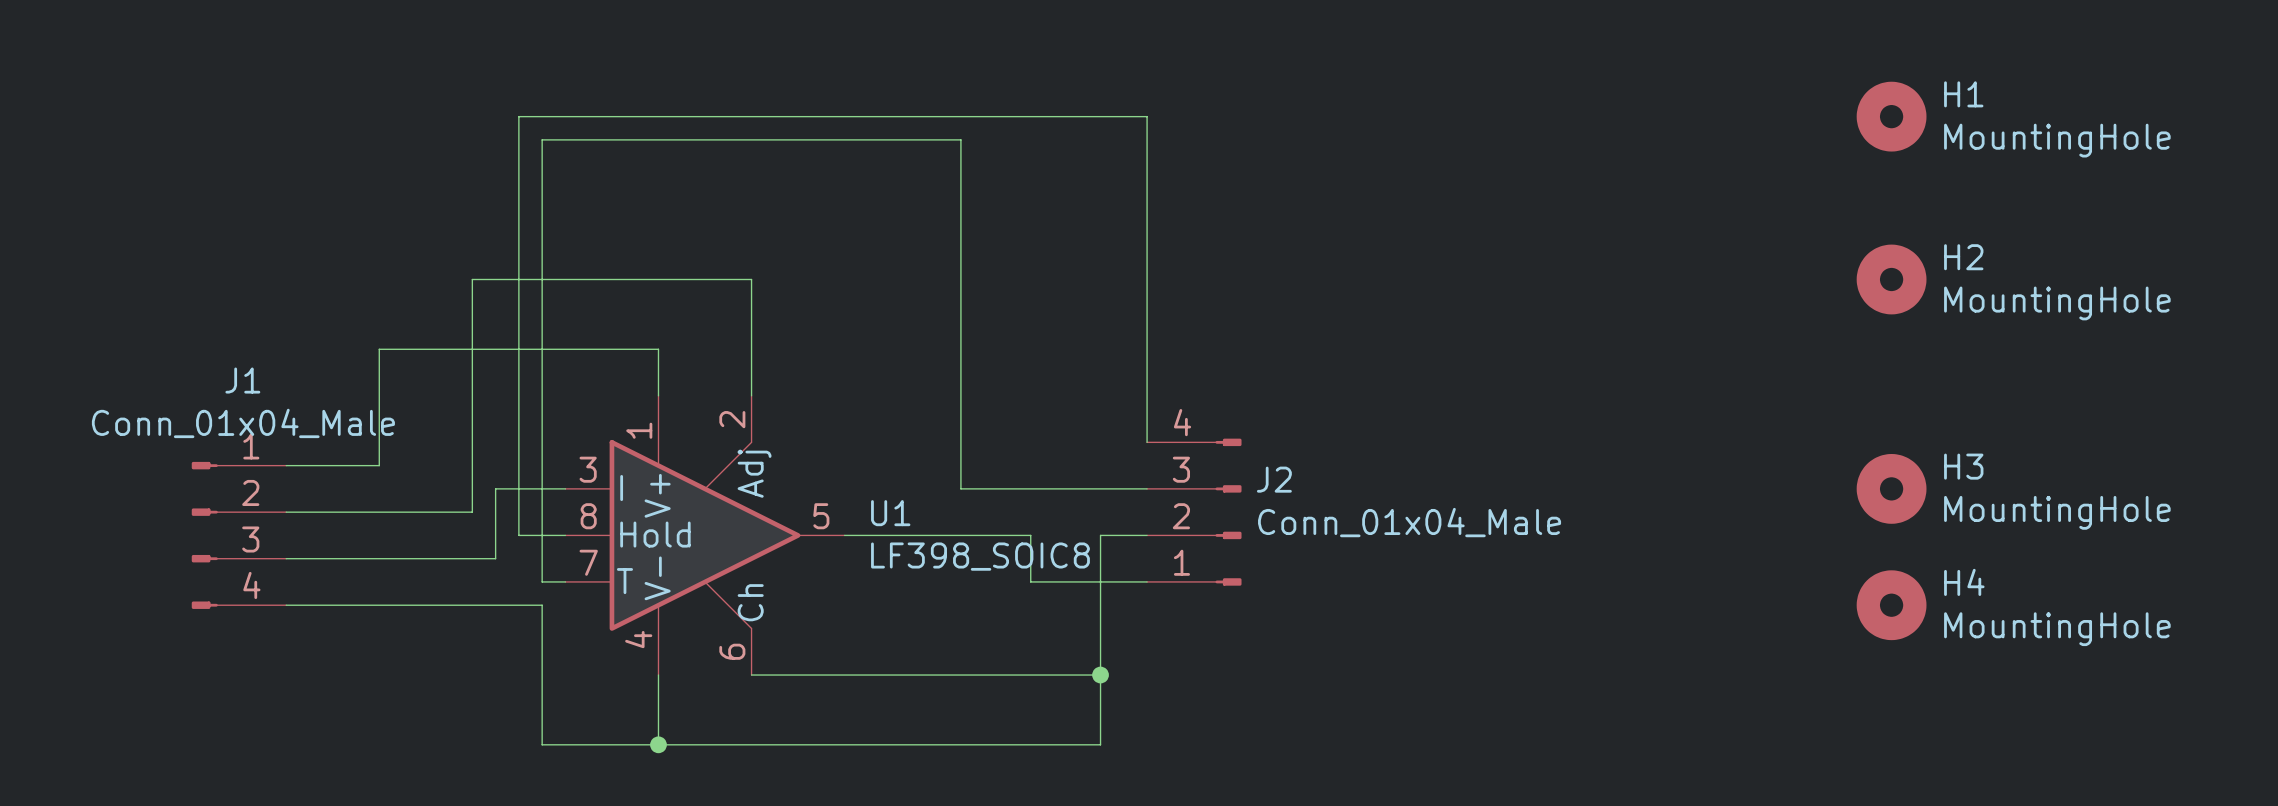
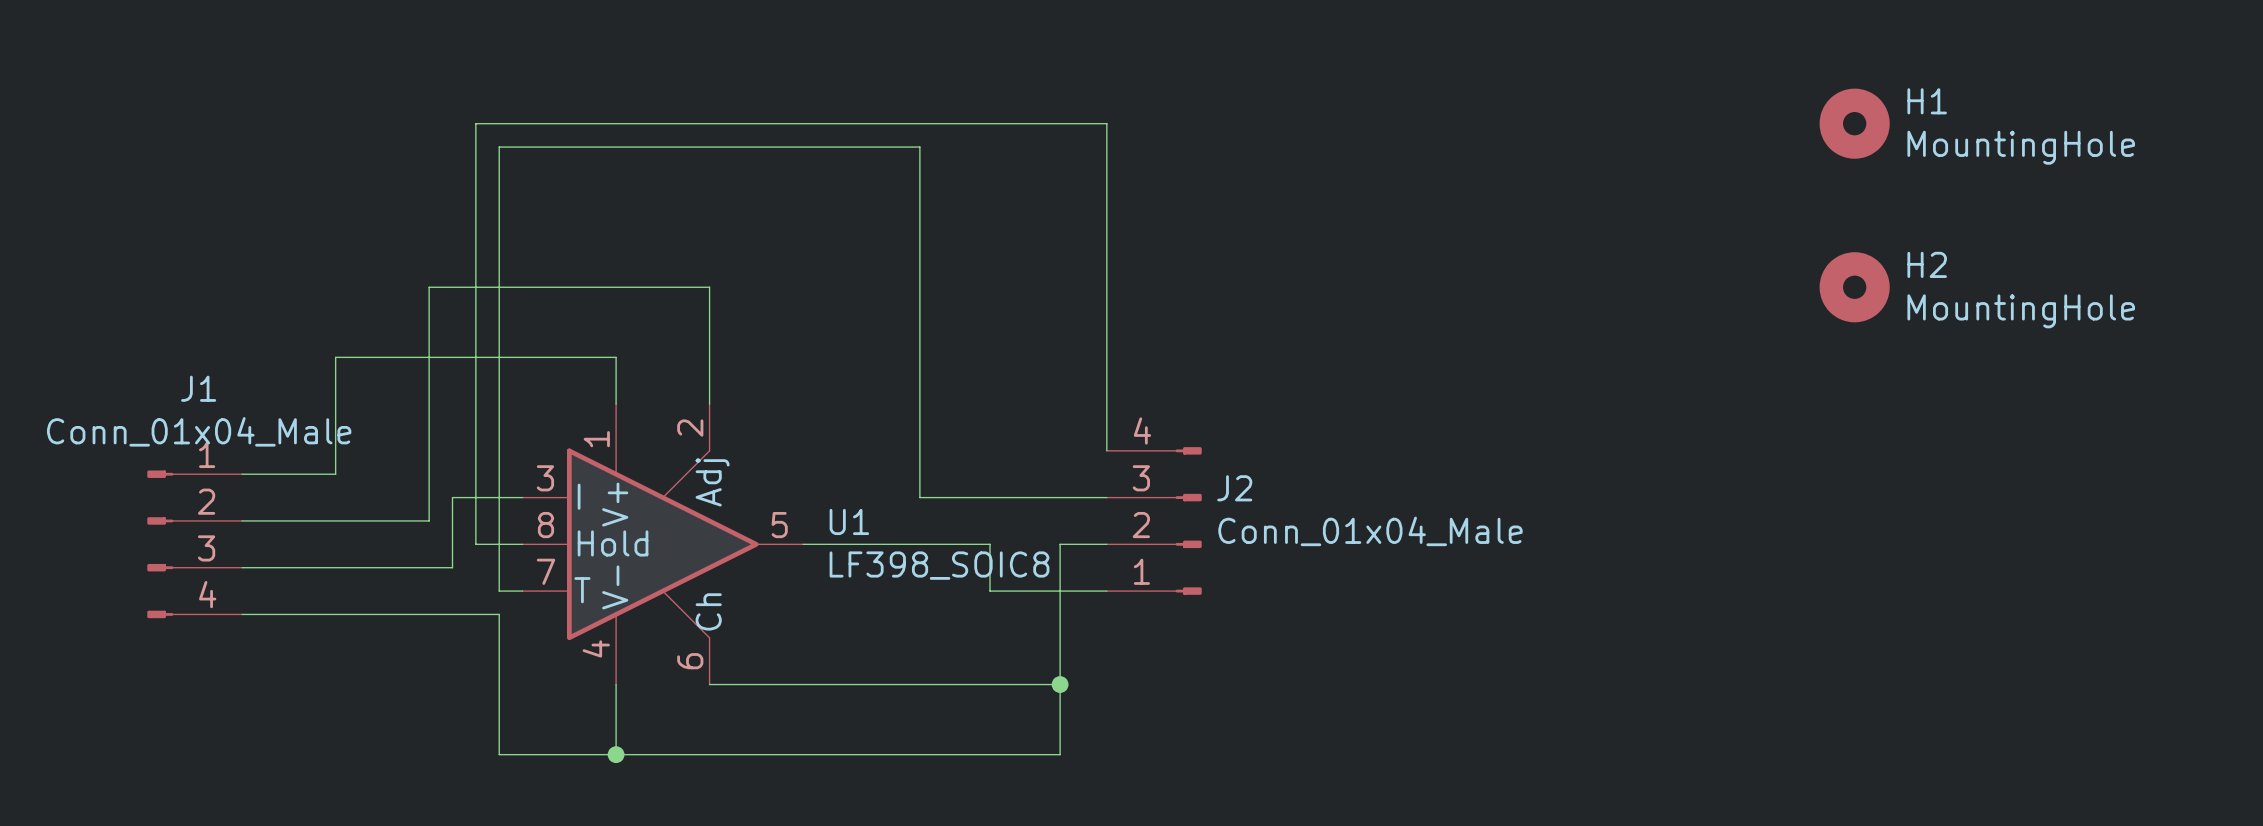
H3: MountingHole (1891, 488) -> none
H4: MountingHole (1891, 605) -> none

